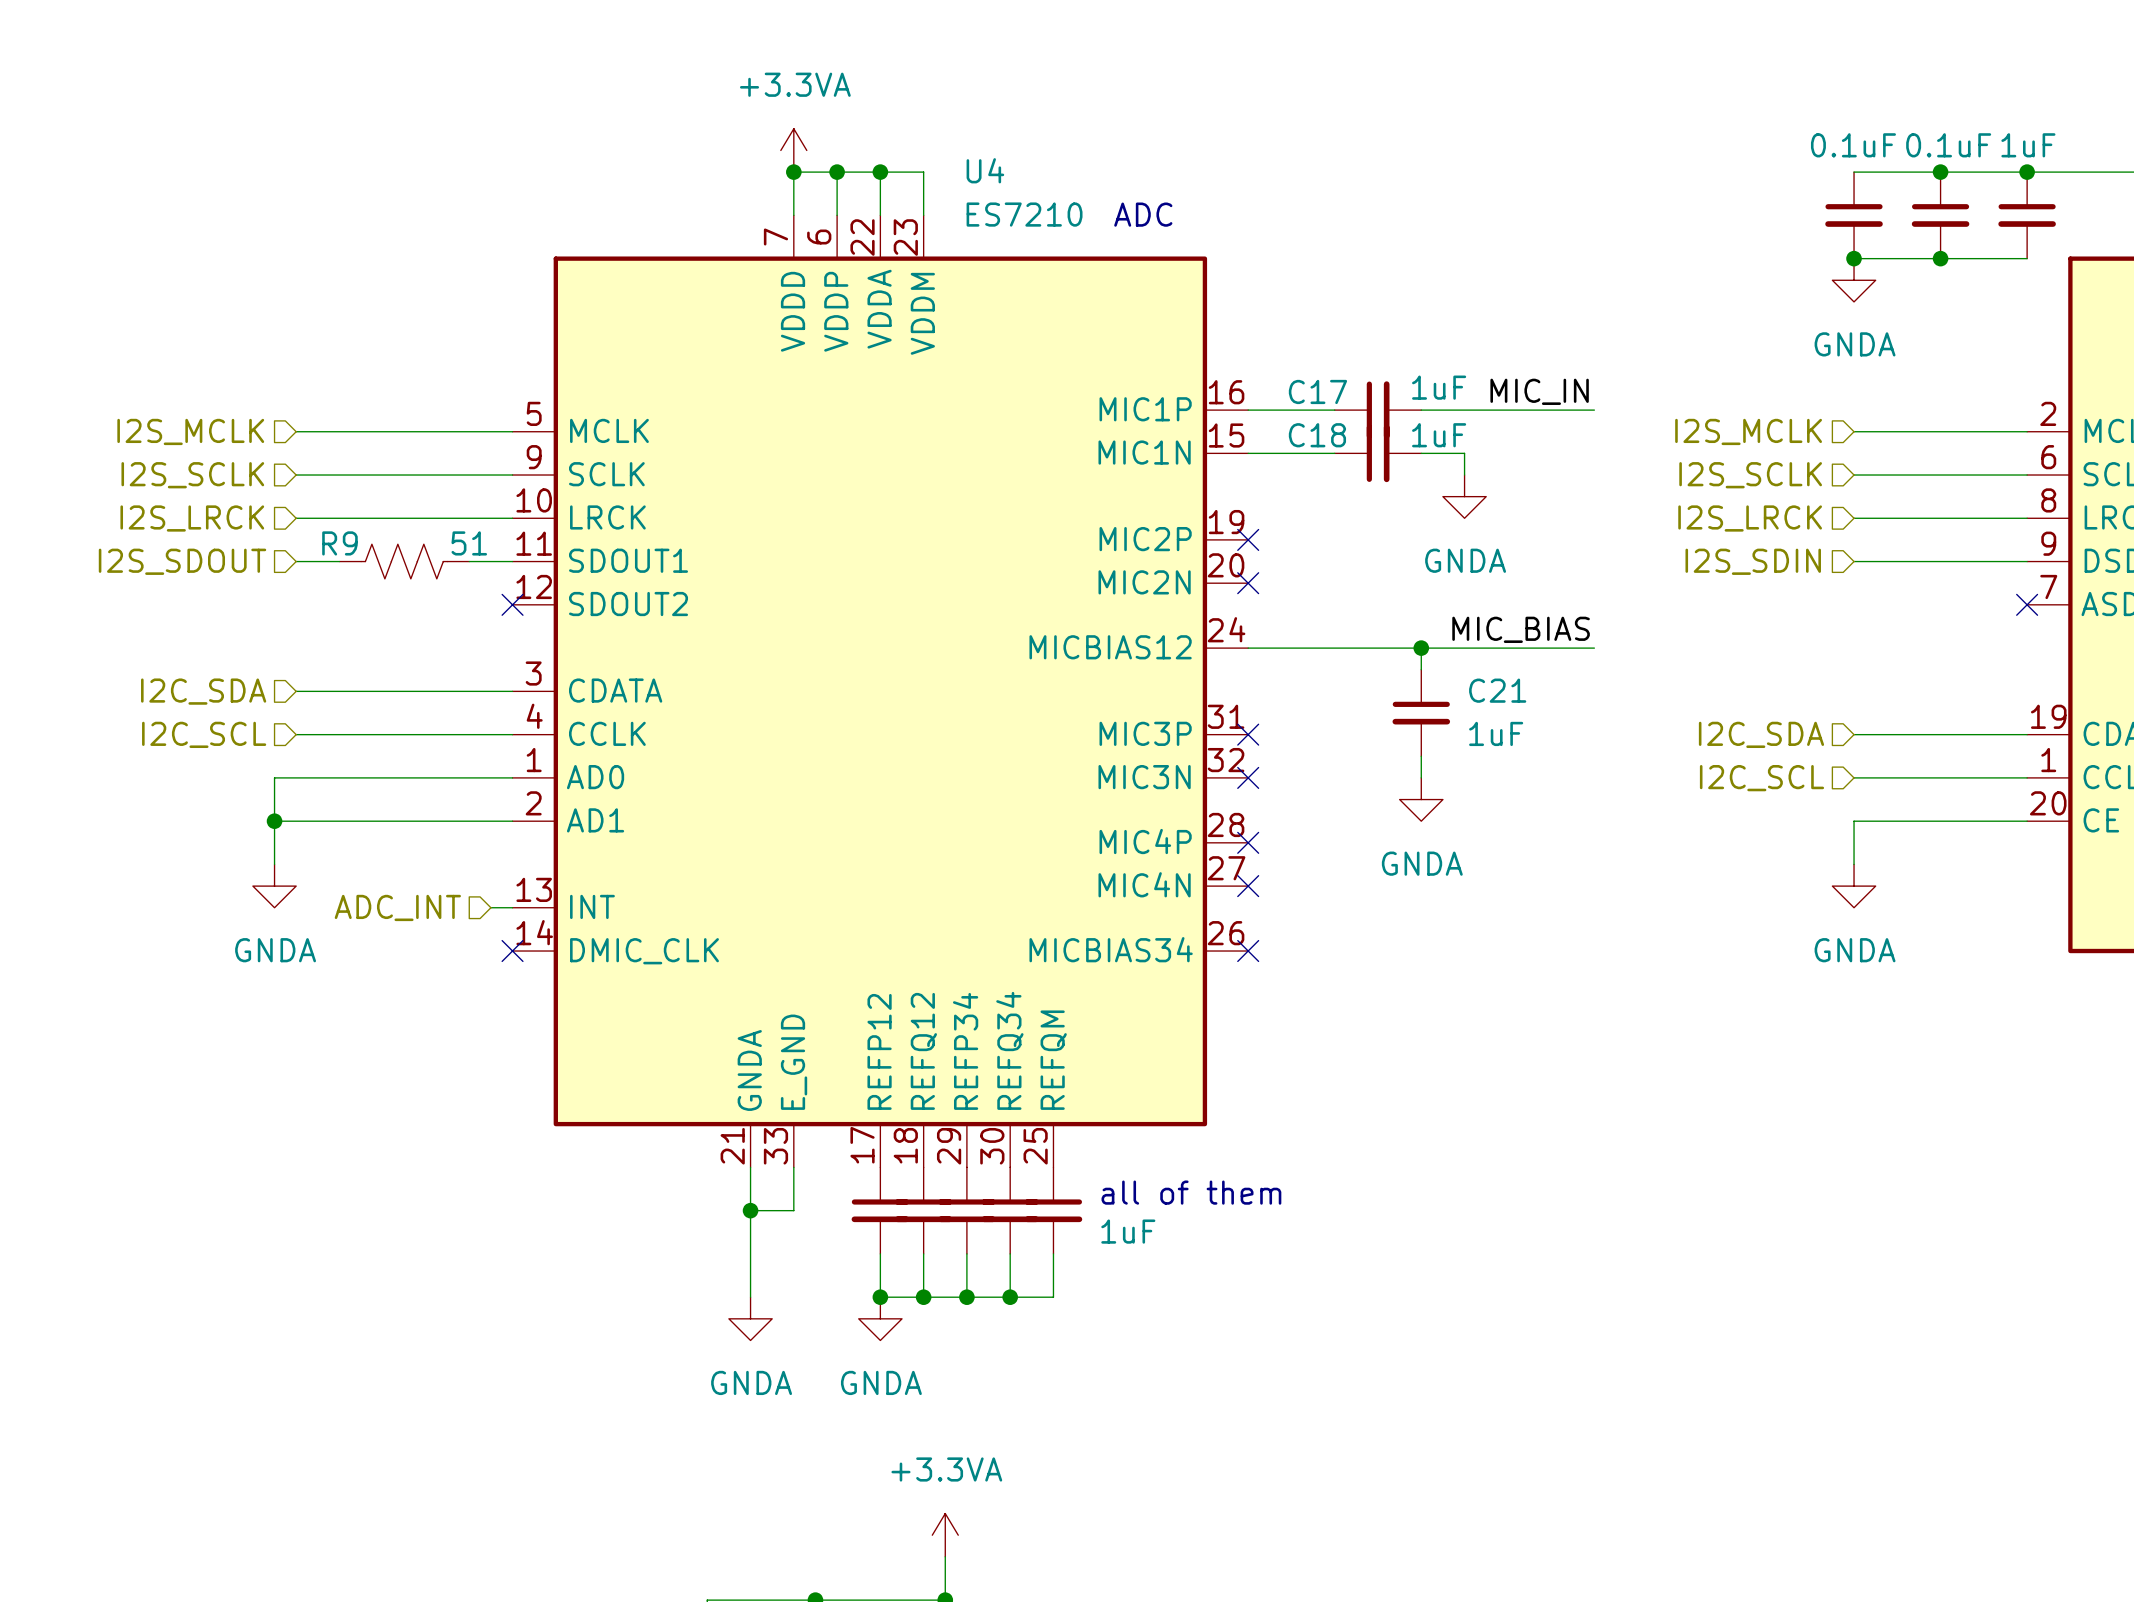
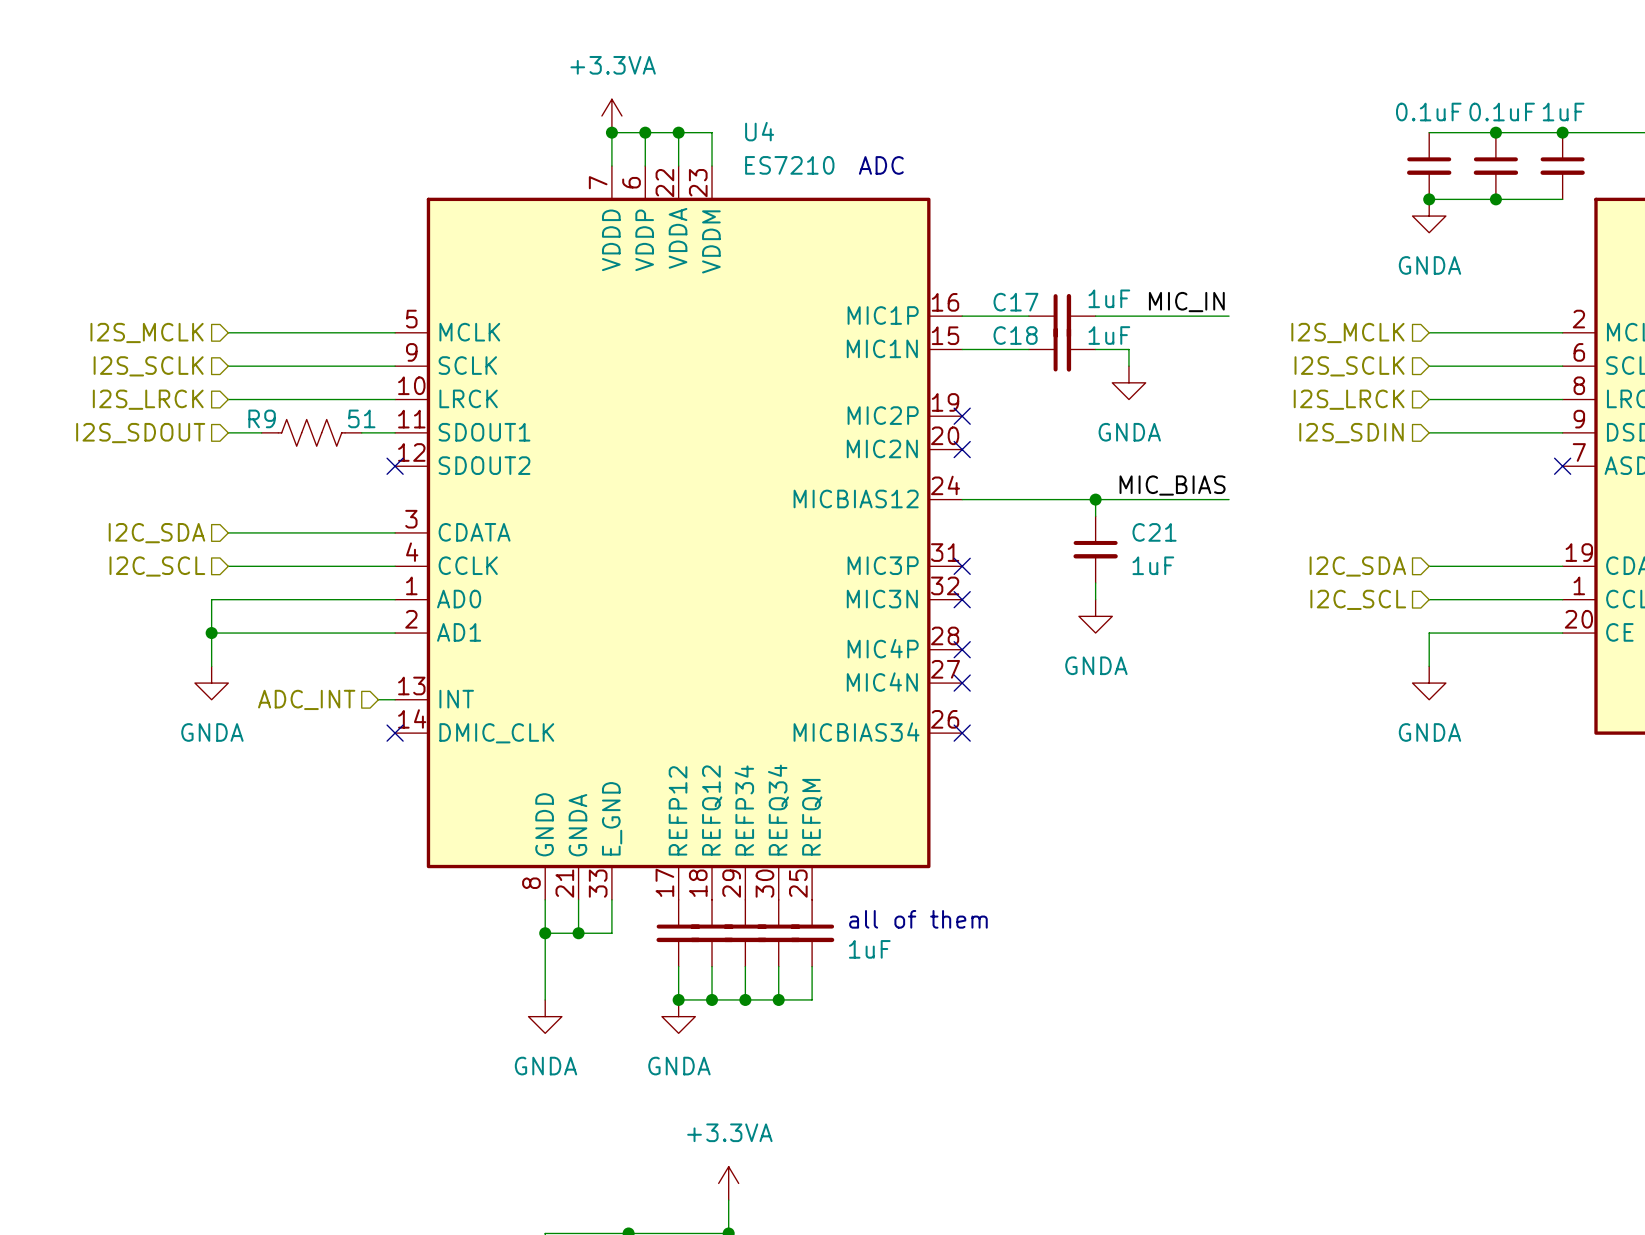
U4 symbol: [512, 215, 1249, 1168] -> [395, 166, 963, 900]
wire: none -> (545, 899) (545, 999)
junction: none -> (545, 933)
wire: (750, 1210) (750, 1297) -> (578, 933) (545, 933)
power symbol position: GNDA (750, 1318) -> GNDA (545, 1016)

